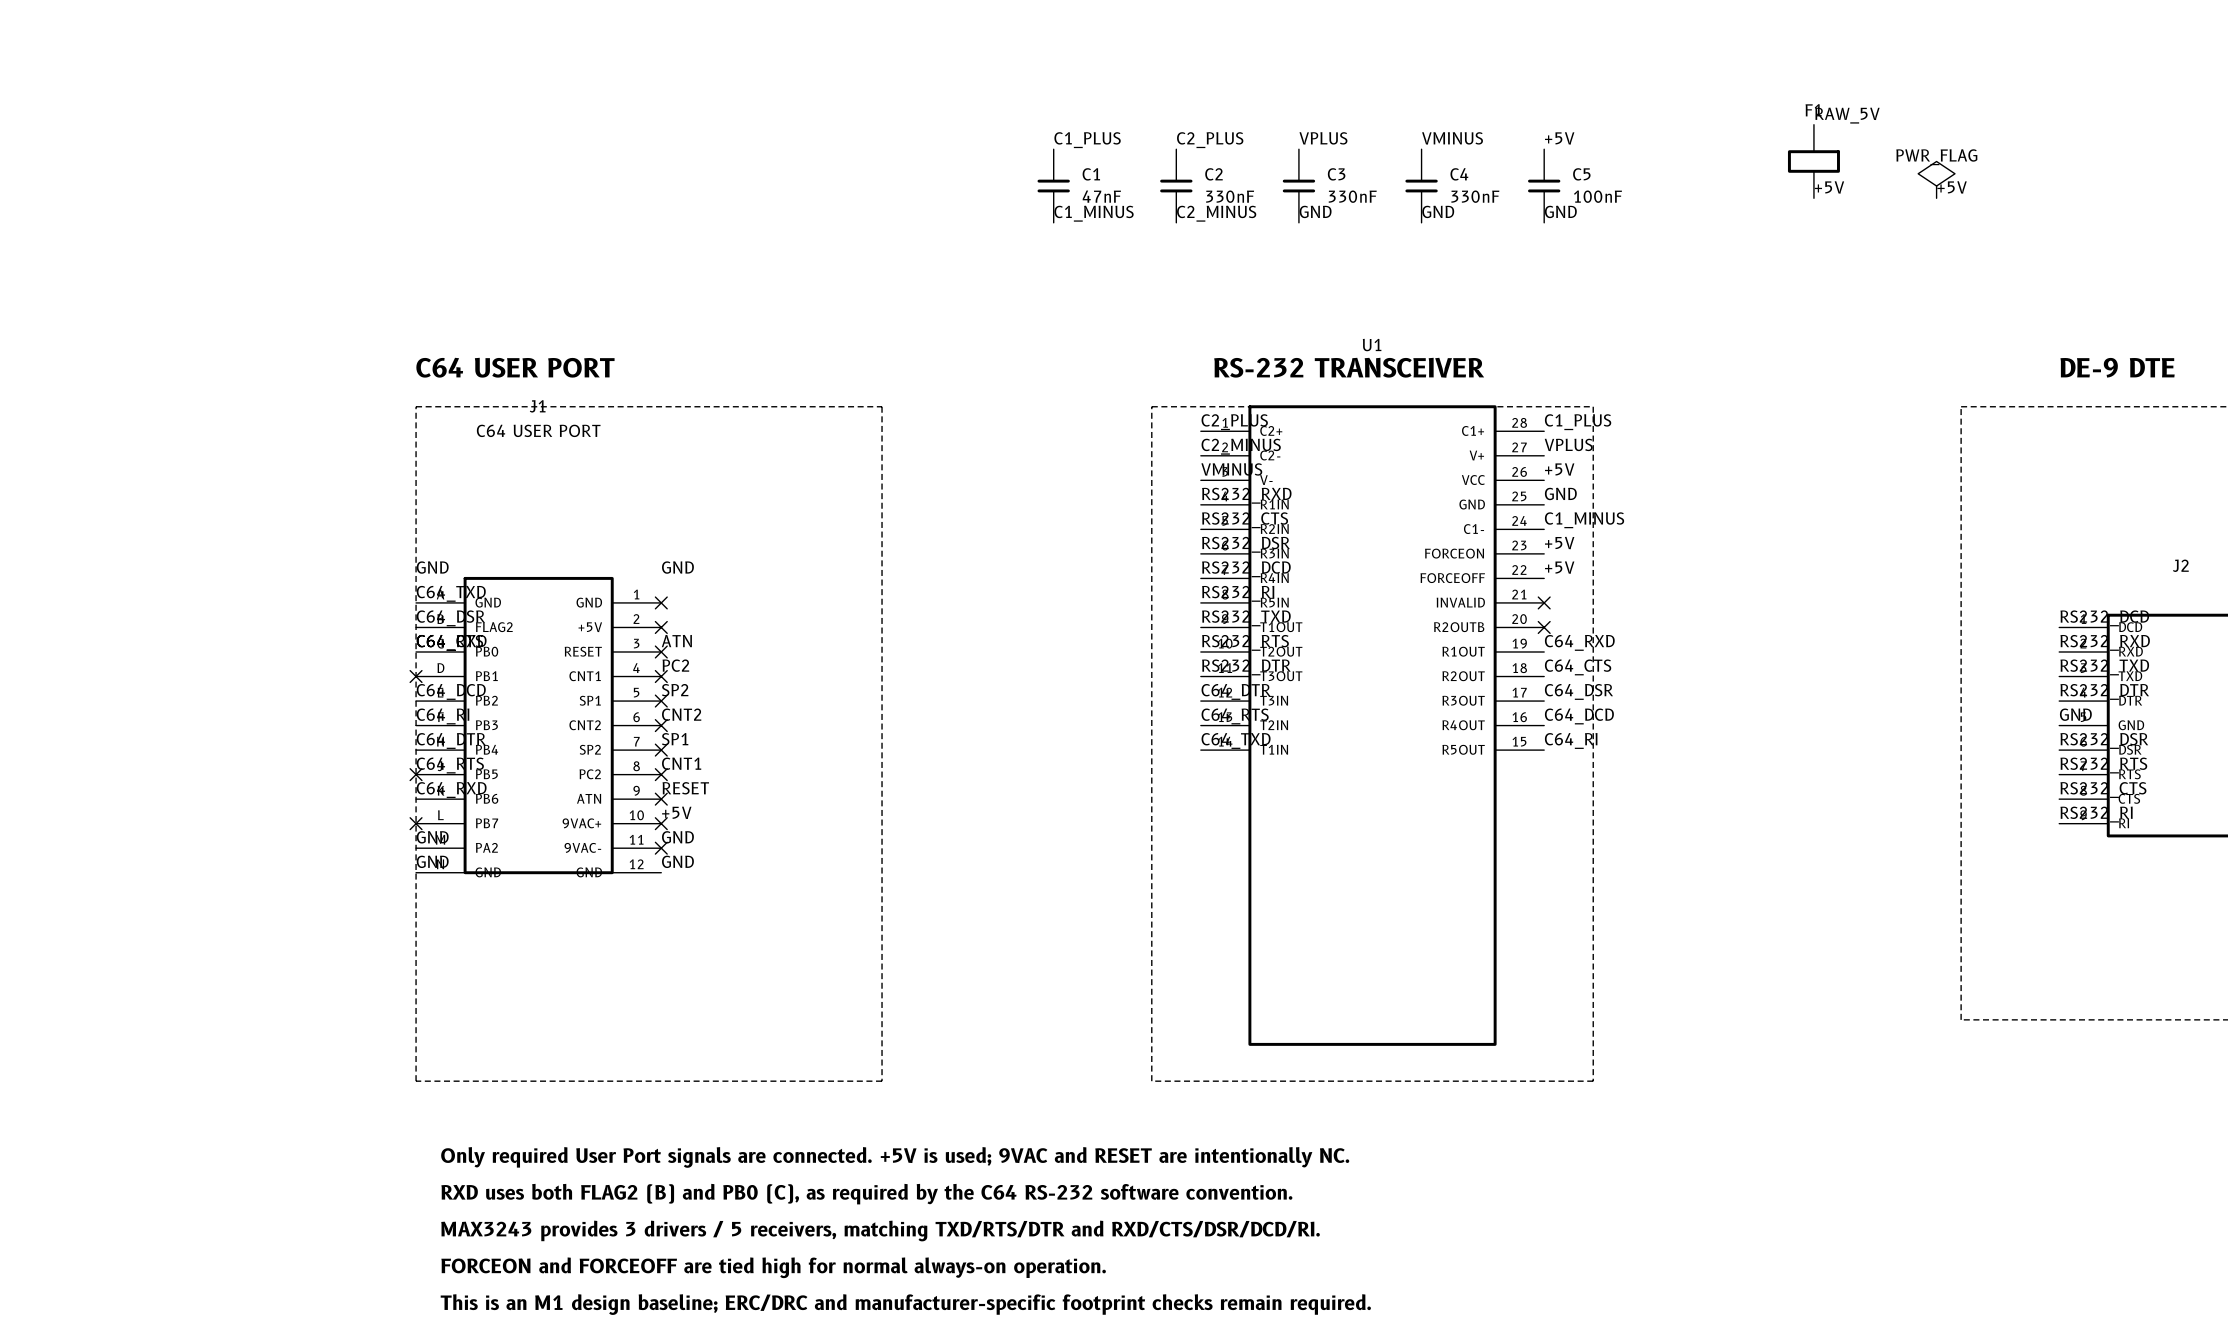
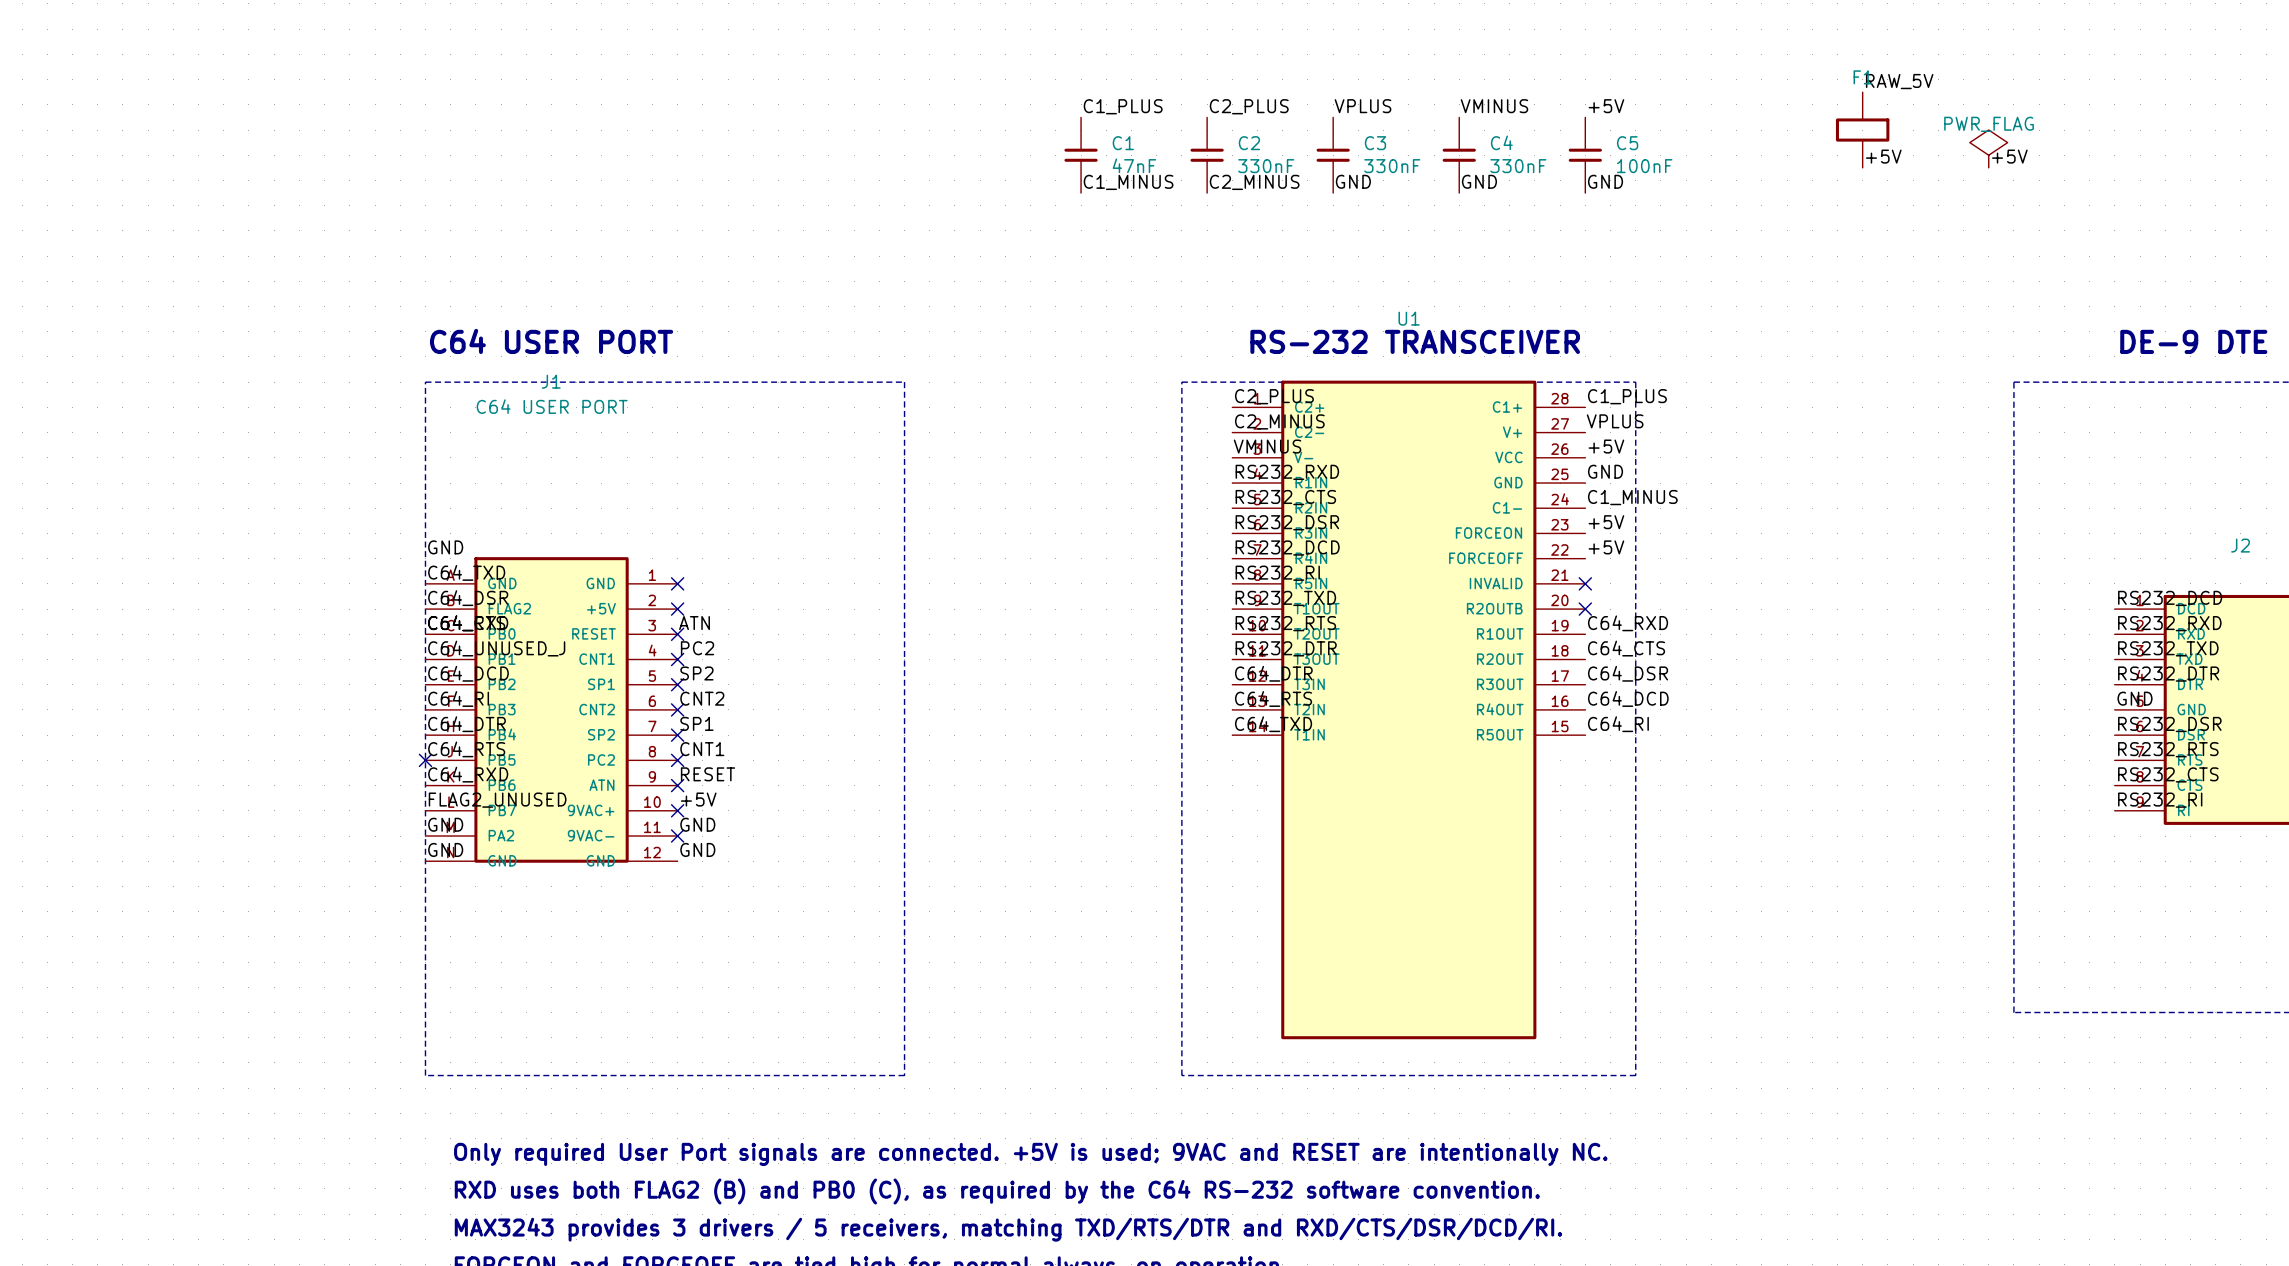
label: GND (677, 567) -> none
label: none -> C64_UNUSED_J (496, 648)
no-connect mark: (416, 676) -> none
label: none -> FLAG2_UNUSED (497, 800)
no-connect mark: (416, 823) -> none

